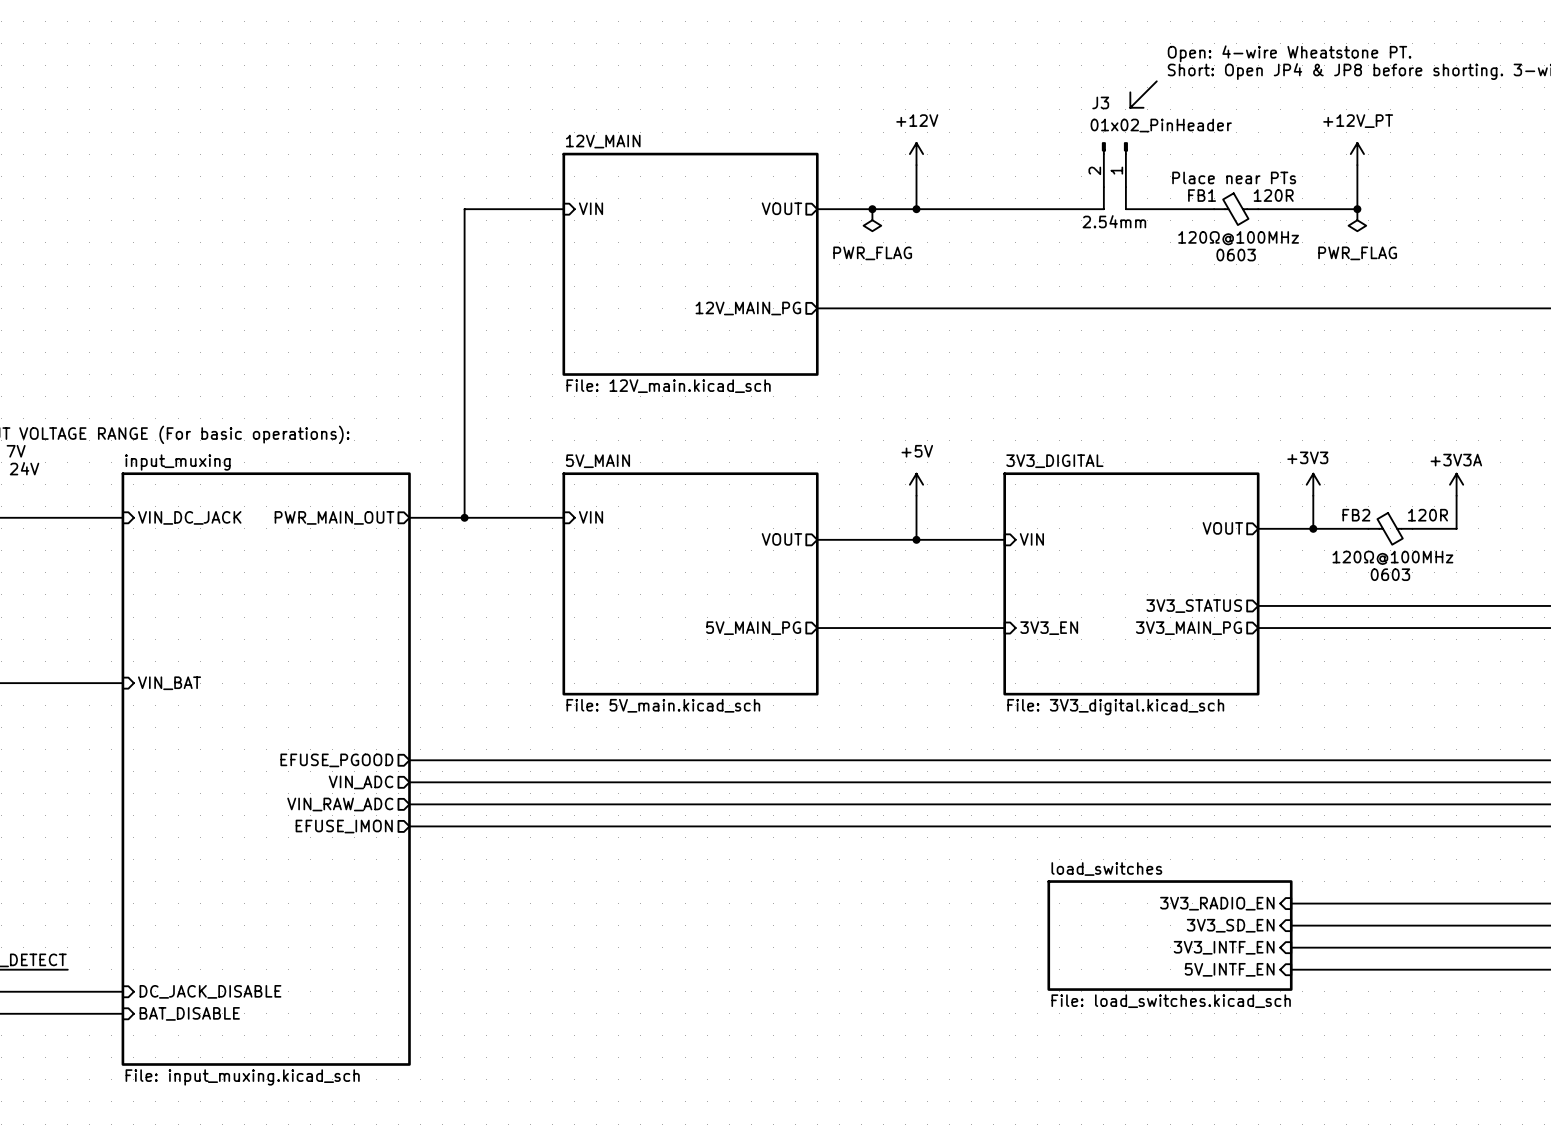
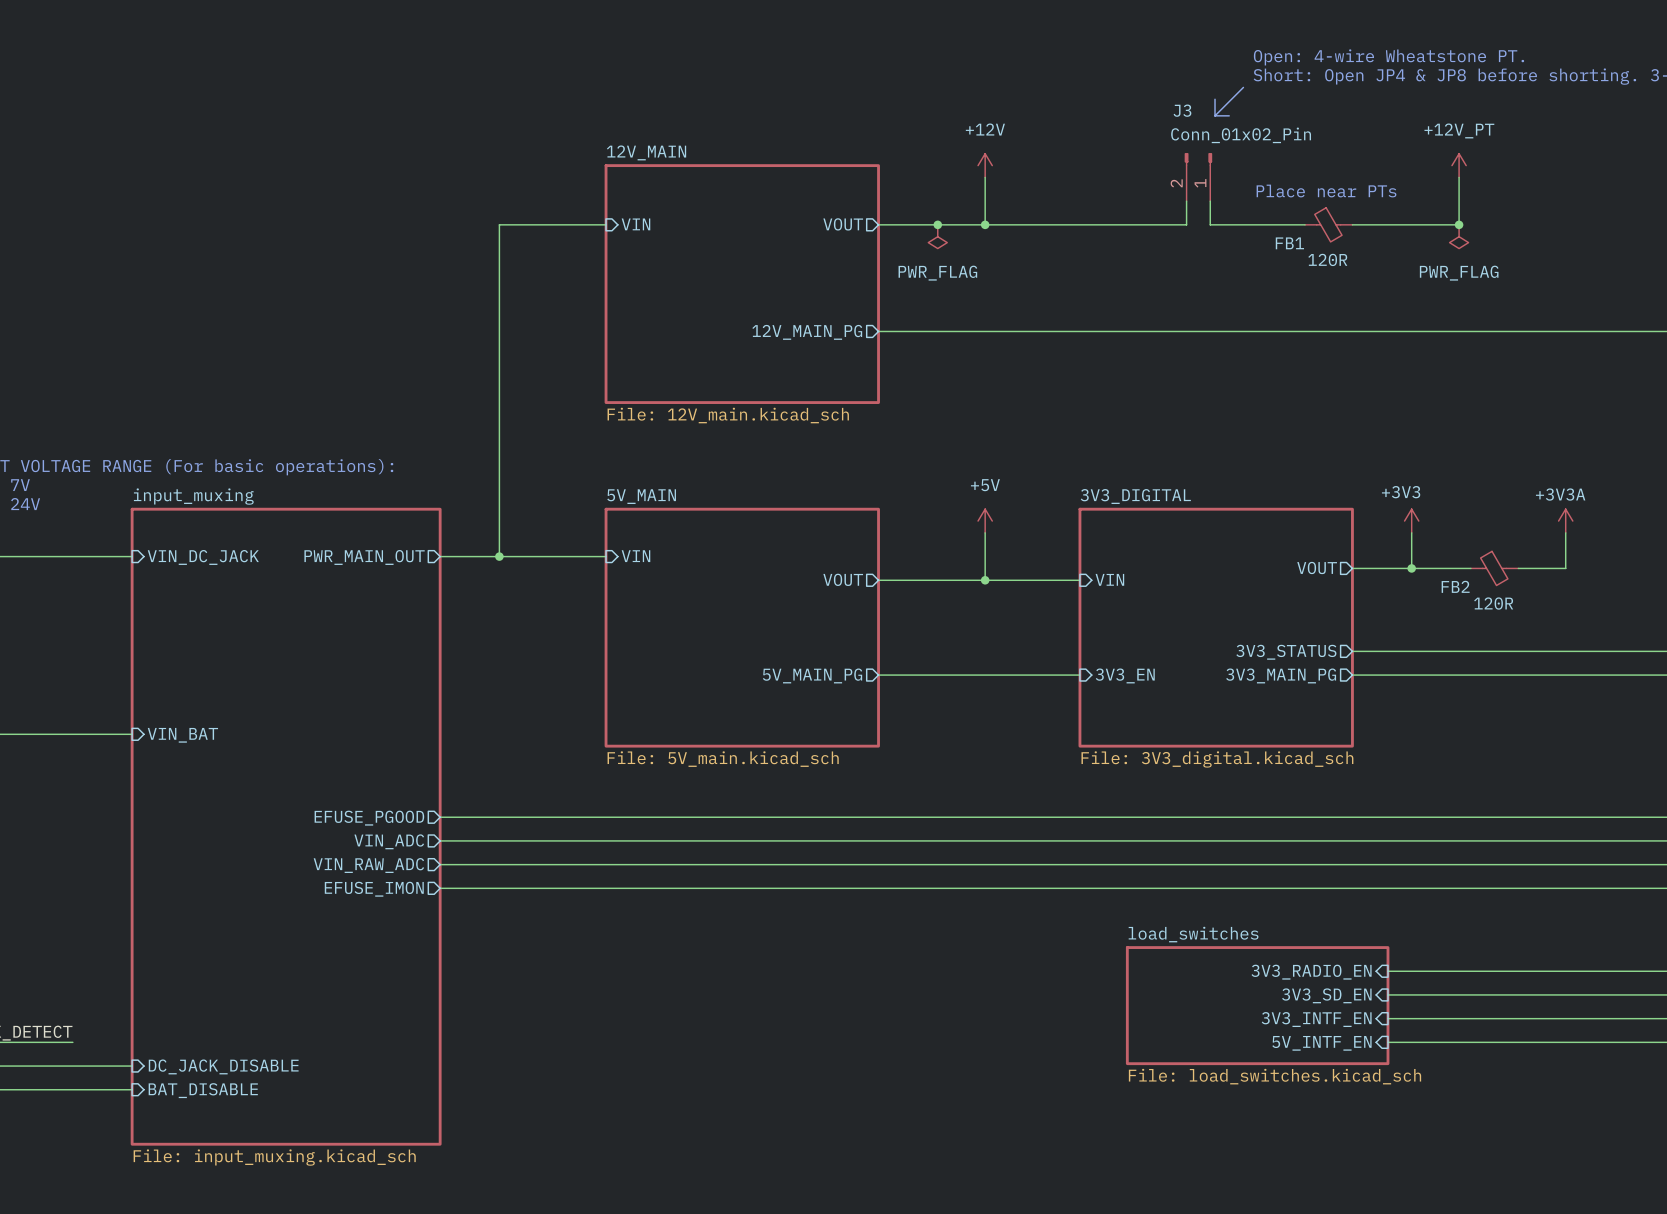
J3 value: 01x02_PinHeader (1161, 125) -> Conn_01x02_Pin (1241, 135)
FB1 name position: FB1 (1202, 195) -> FB1 (1289, 243)
FB1 value position: 120R (1273, 195) -> 120R (1327, 259)
J3 text: 2.54mm (1114, 221) -> none
FB1 text: 120Ω@100MHz (1238, 238) -> none
FB1 text: 0603 (1236, 255) -> none
FB2 name position: FB2 (1356, 515) -> FB2 (1455, 586)
FB2 value position: 120R (1428, 515) -> 120R (1493, 603)
FB2 text: 120Ω@100MHz (1392, 557) -> none
FB2 text: 0603 (1390, 574) -> none

